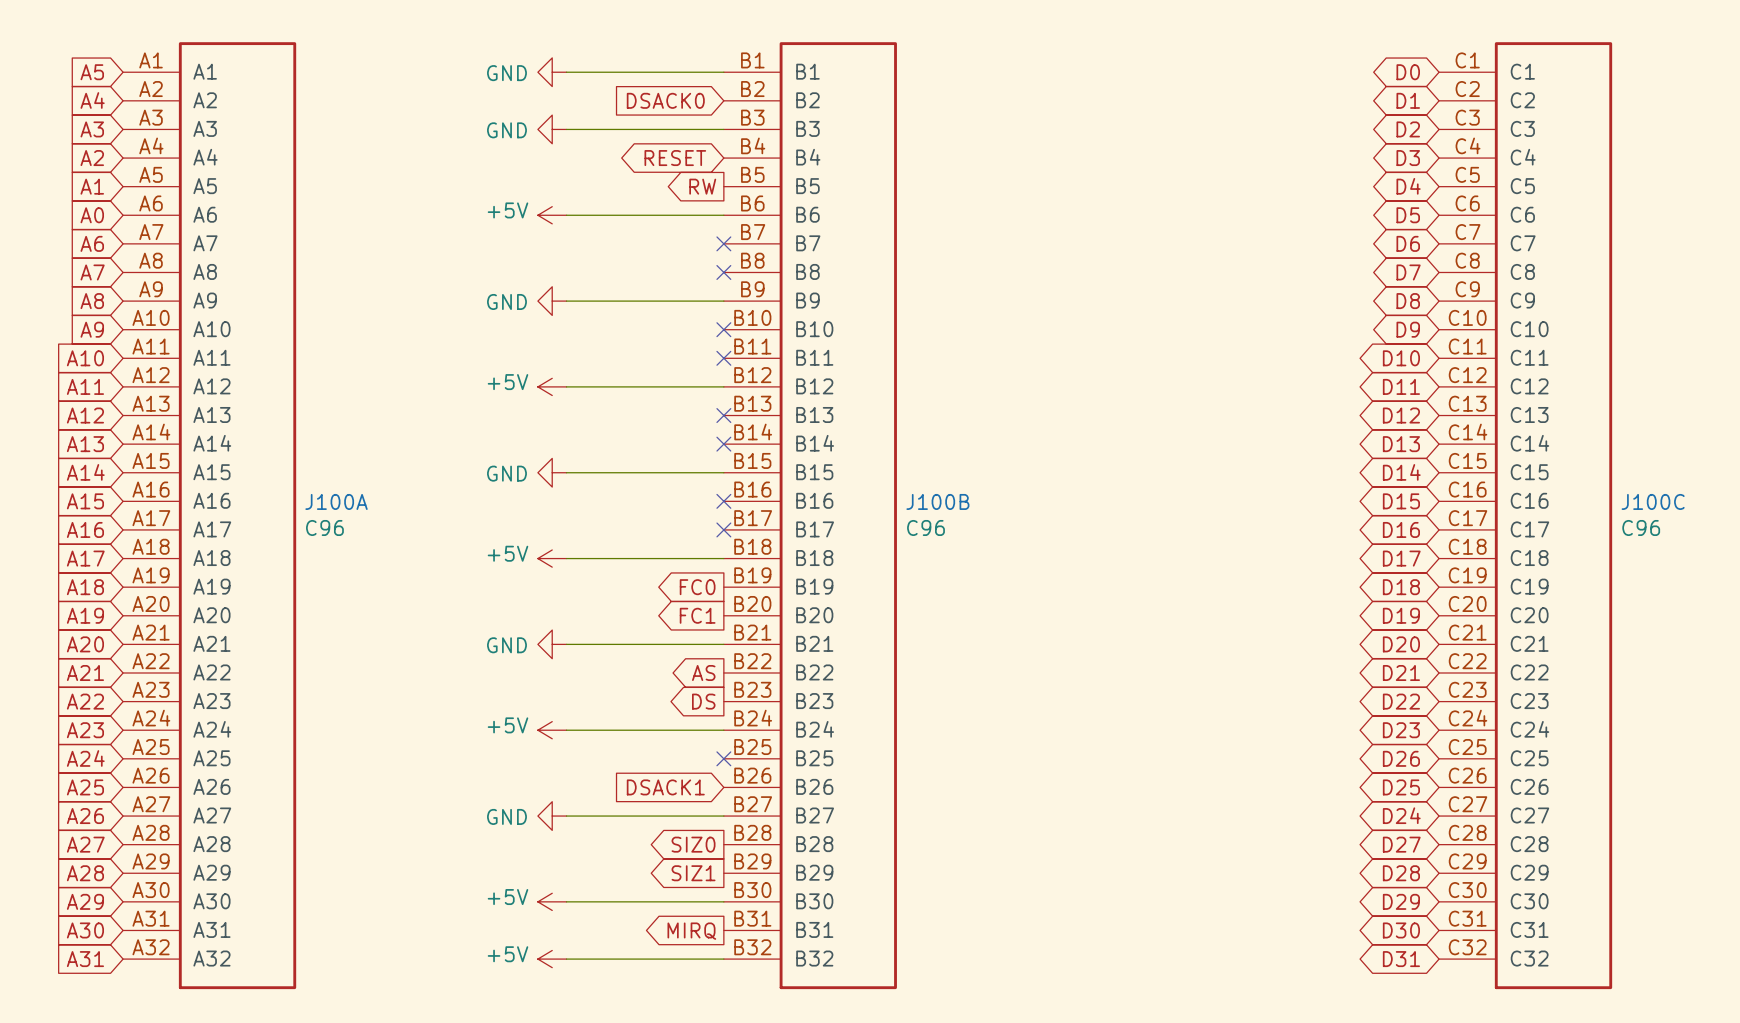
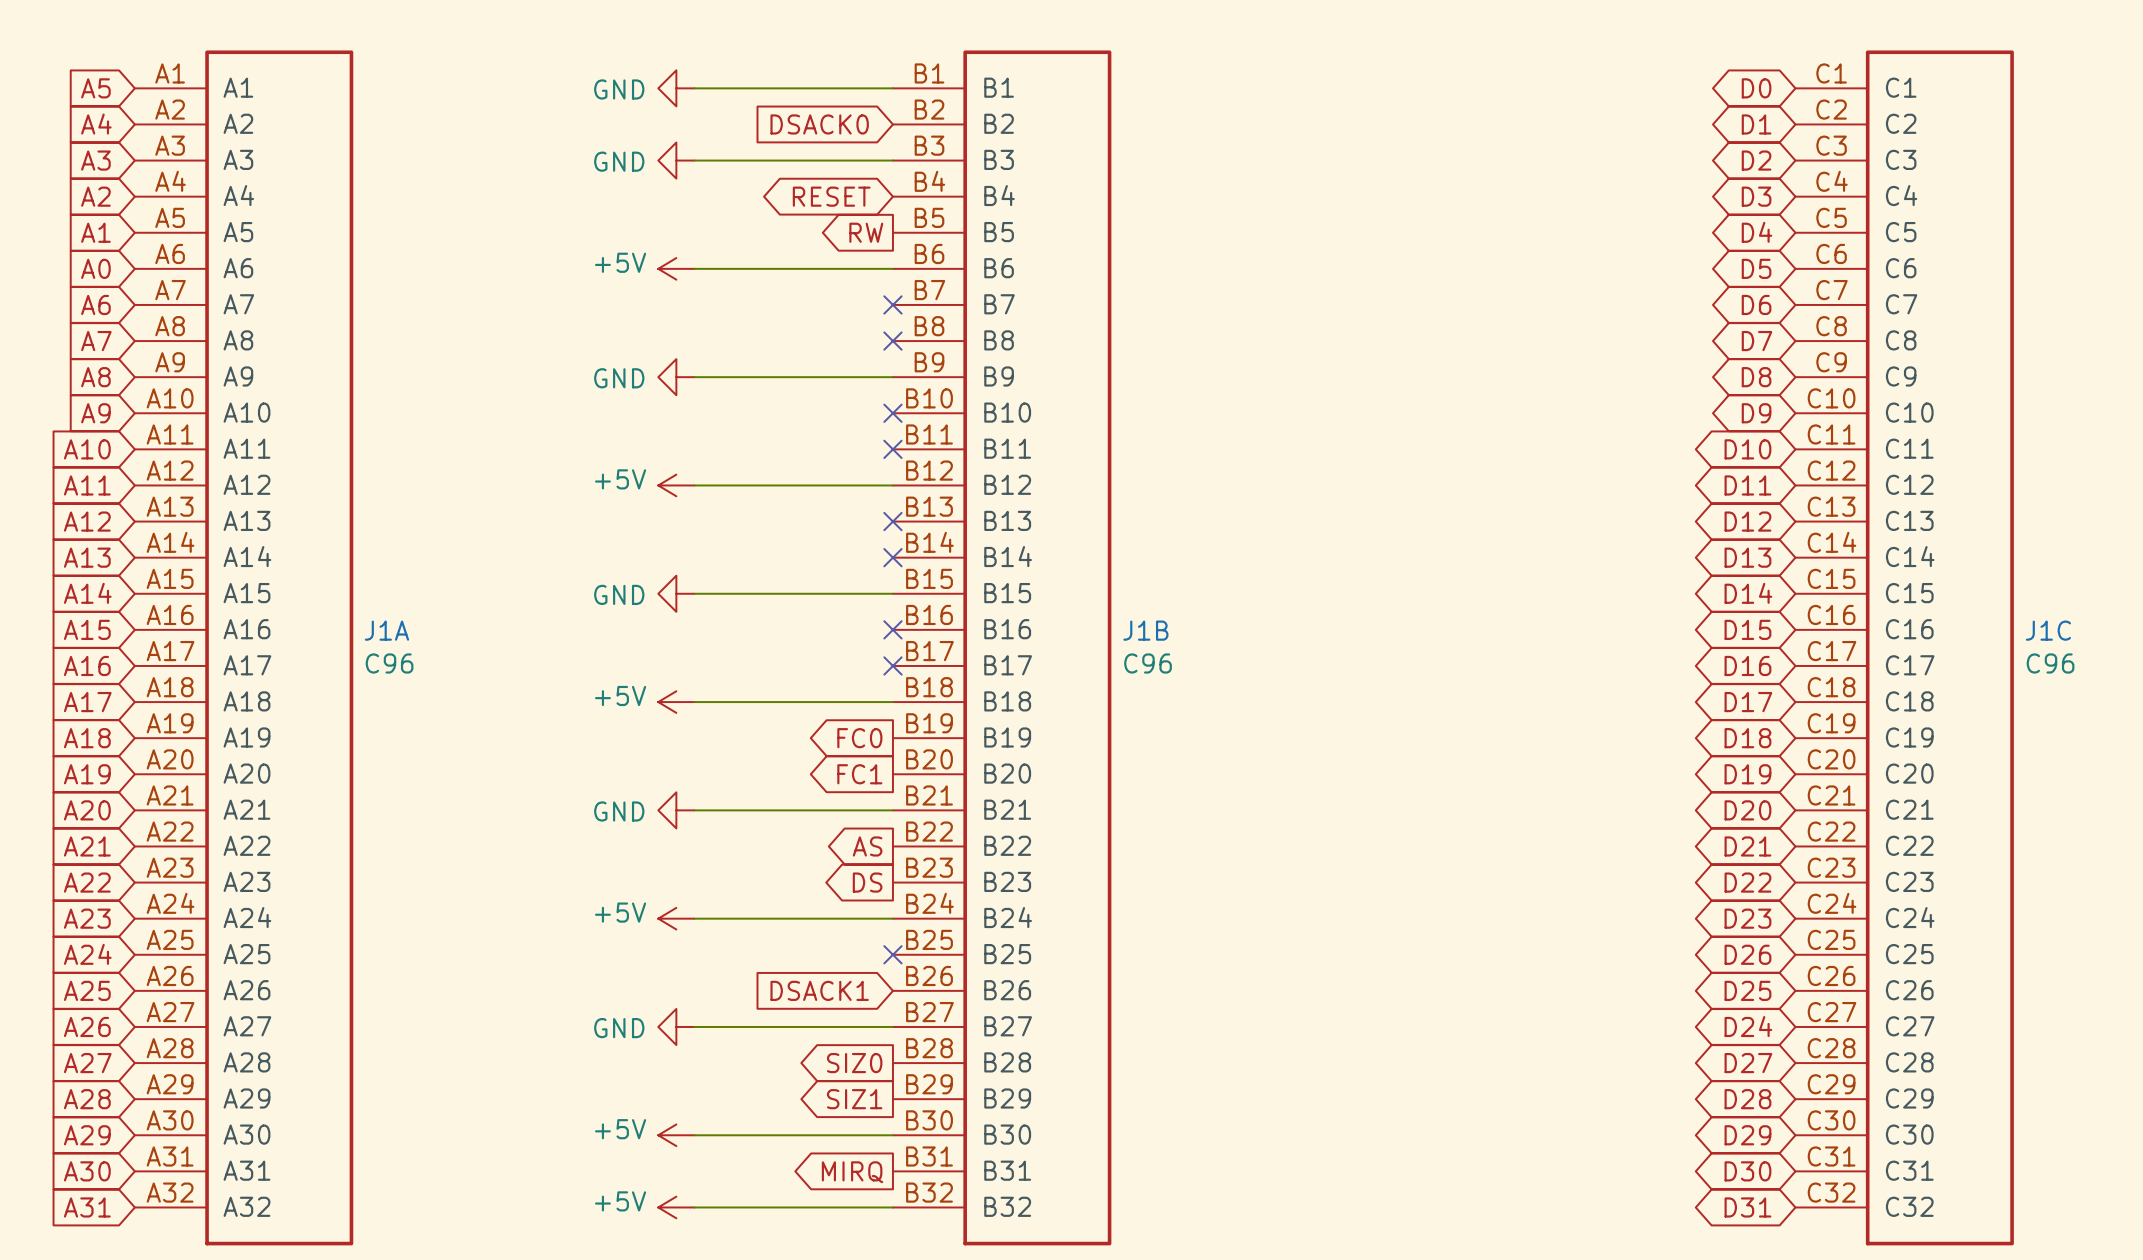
J100A name: J100A (336, 501) -> J1A (386, 630)
J100B name: J100B (937, 501) -> J1B (1145, 630)
J100C name: J100C (1653, 501) -> J1C (2048, 630)

